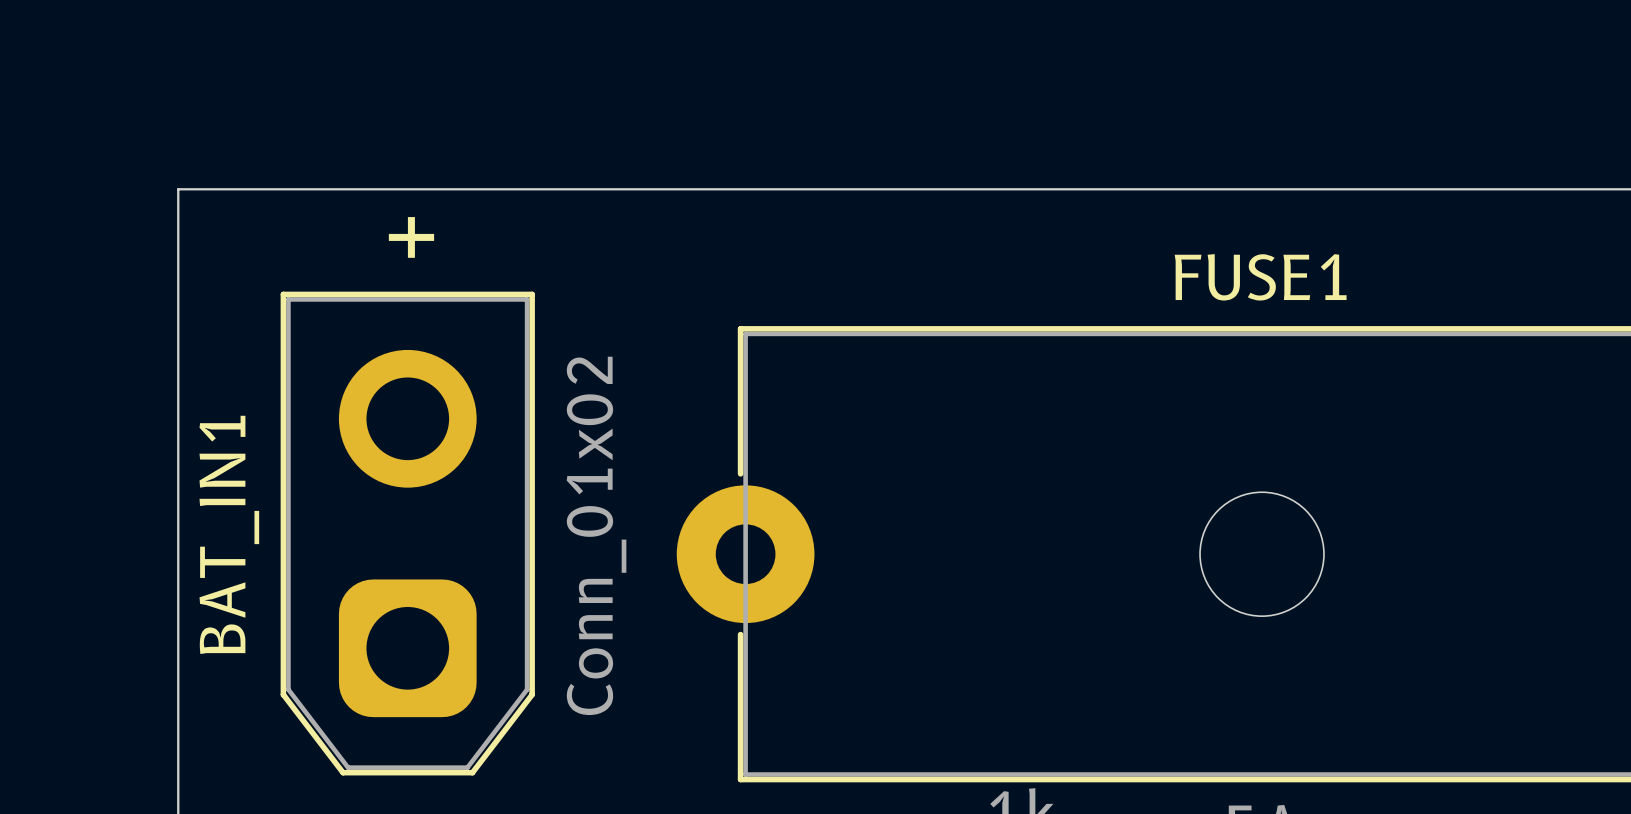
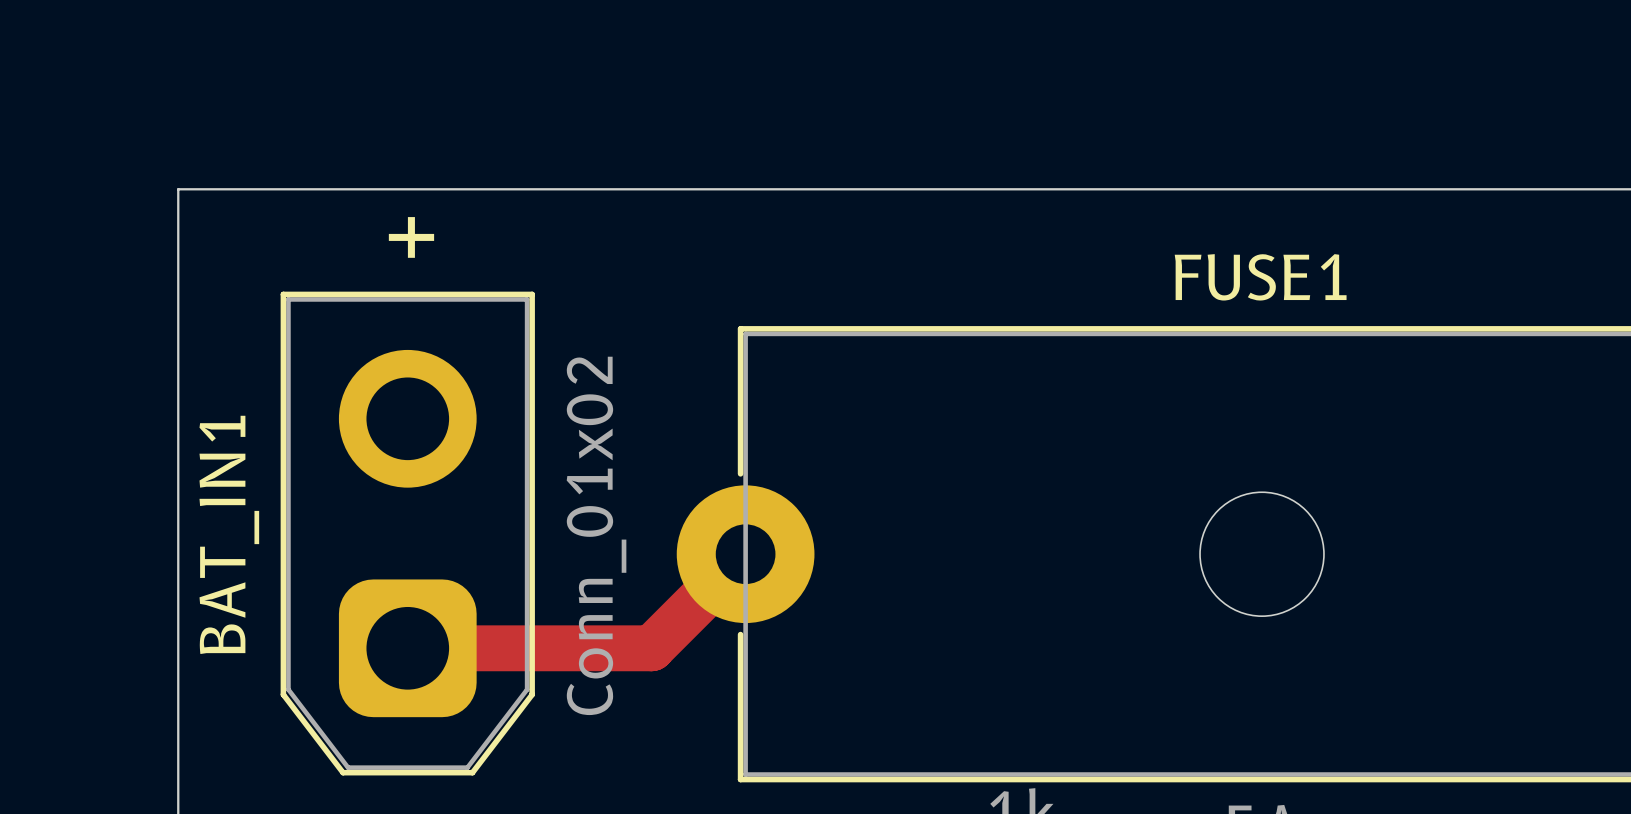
top track: none -> (745, 554) (651, 648) (407, 648)

